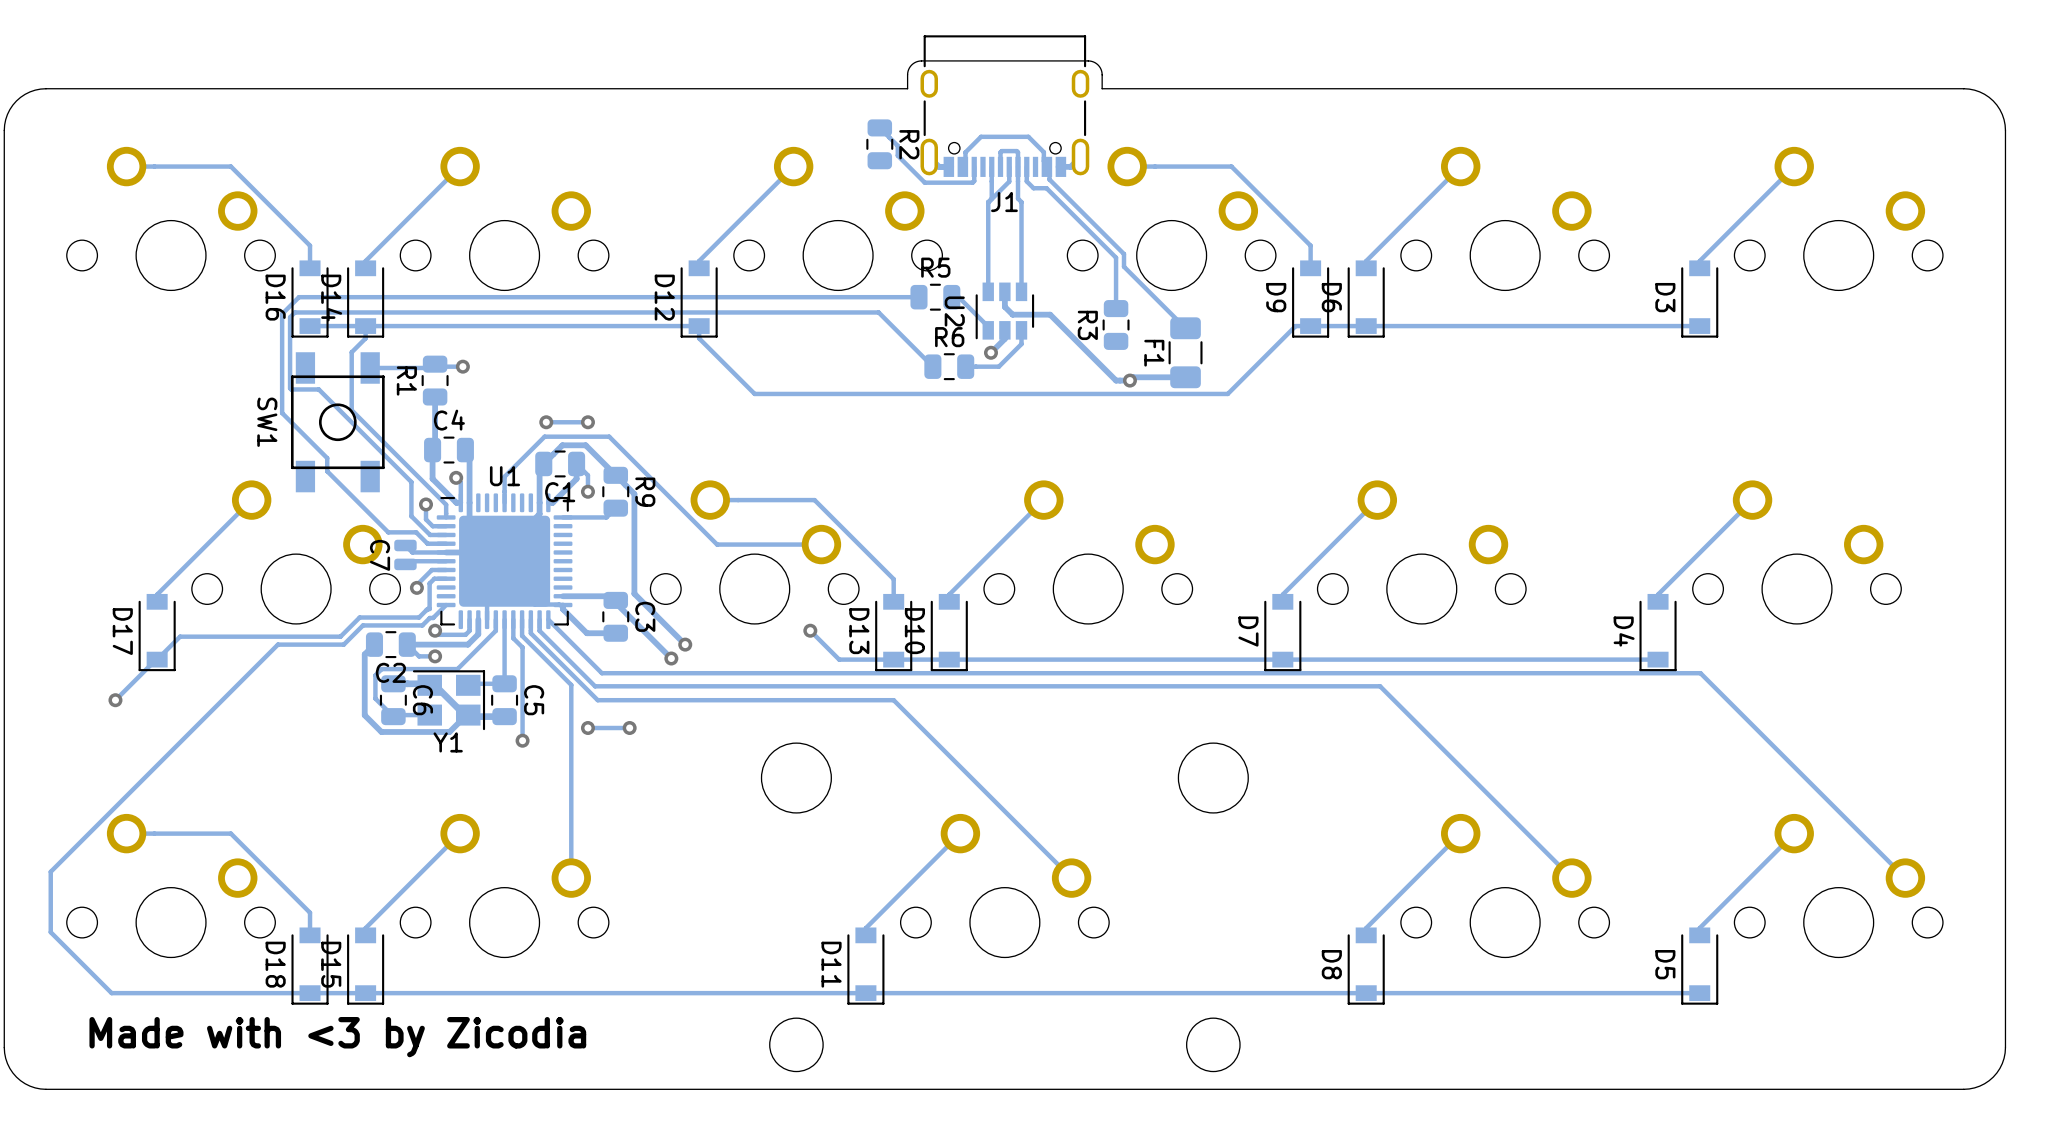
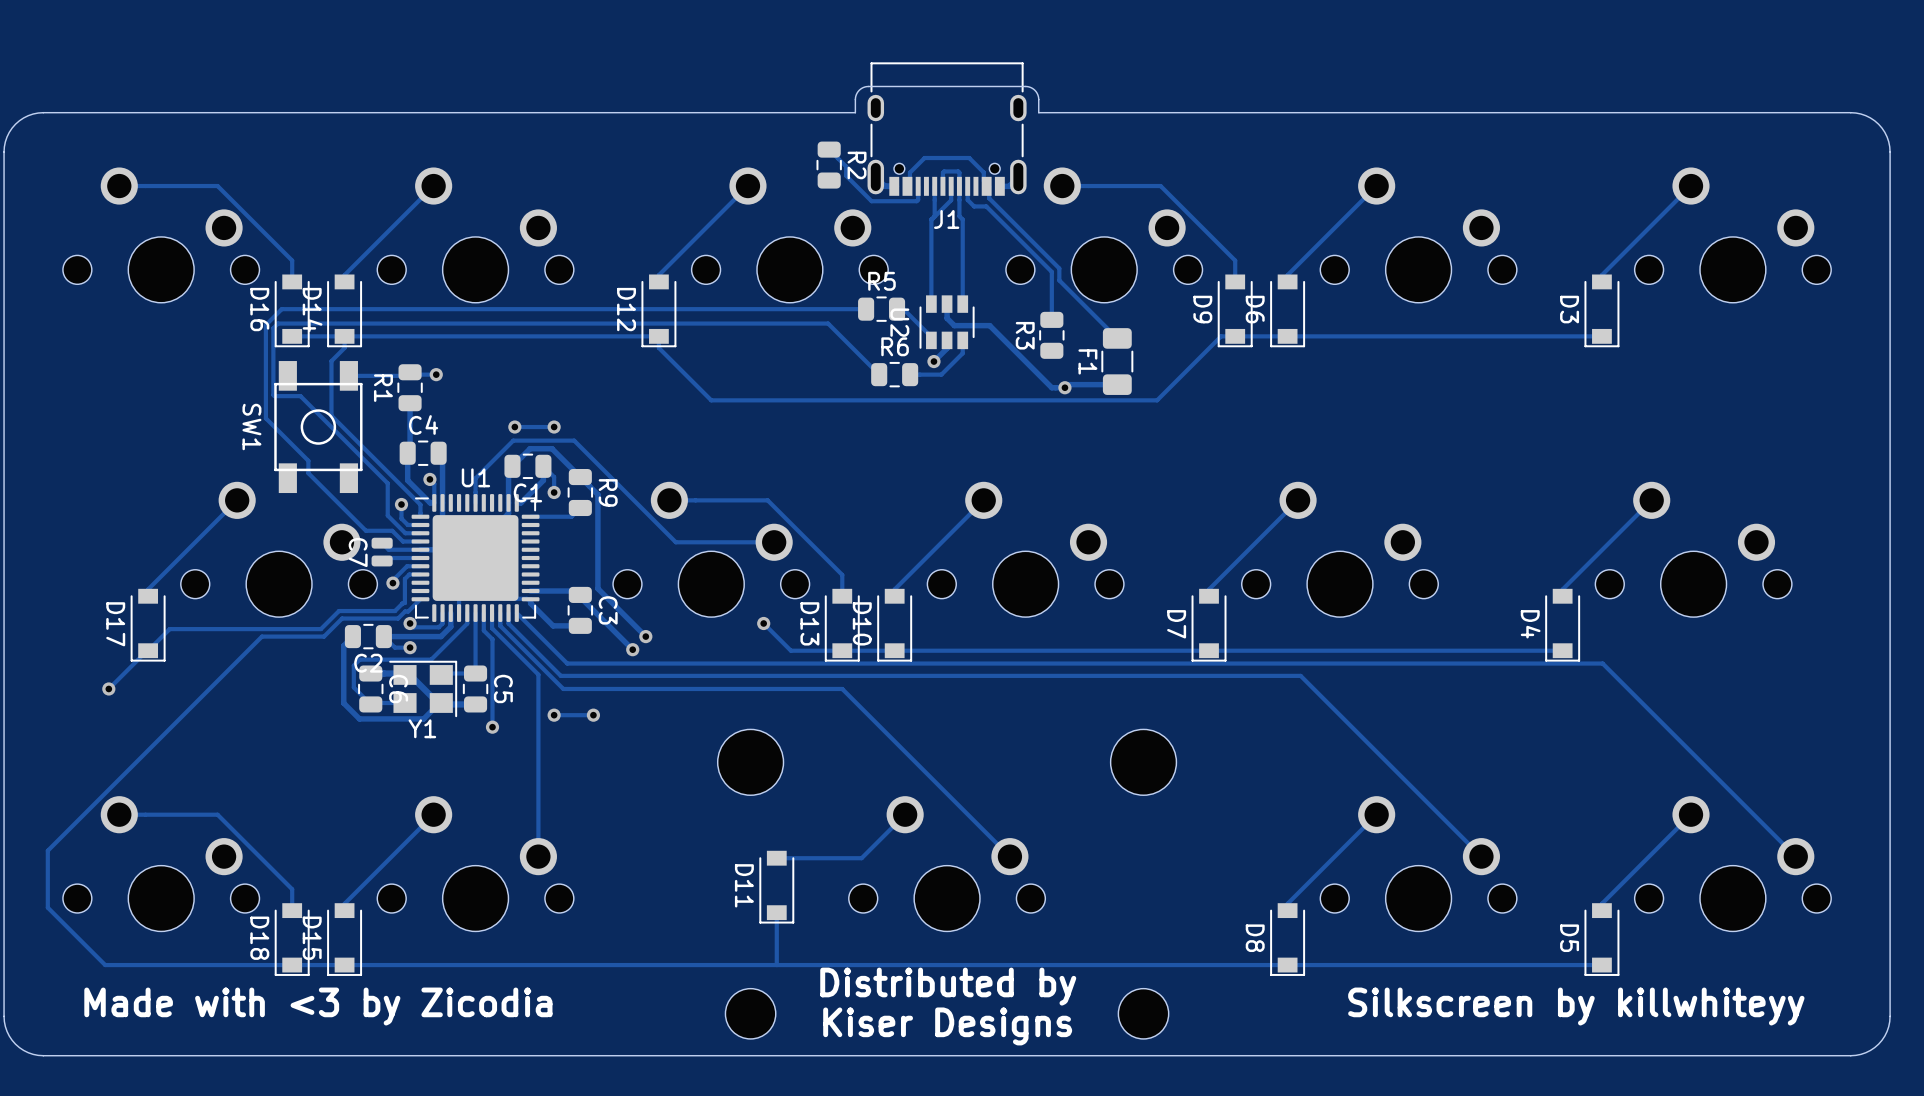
track: (914, 879) (865, 928) (865, 935) -> (861, 858) (776, 858)
track: none -> (776, 912) (777, 965)
D11 position: (865, 966) -> (776, 887)
text: none -> Distributed by (948, 986)
text: none -> Silkscreen by killwhiteyy (1576, 1006)
text: none -> Kiser Designs (947, 1026)

